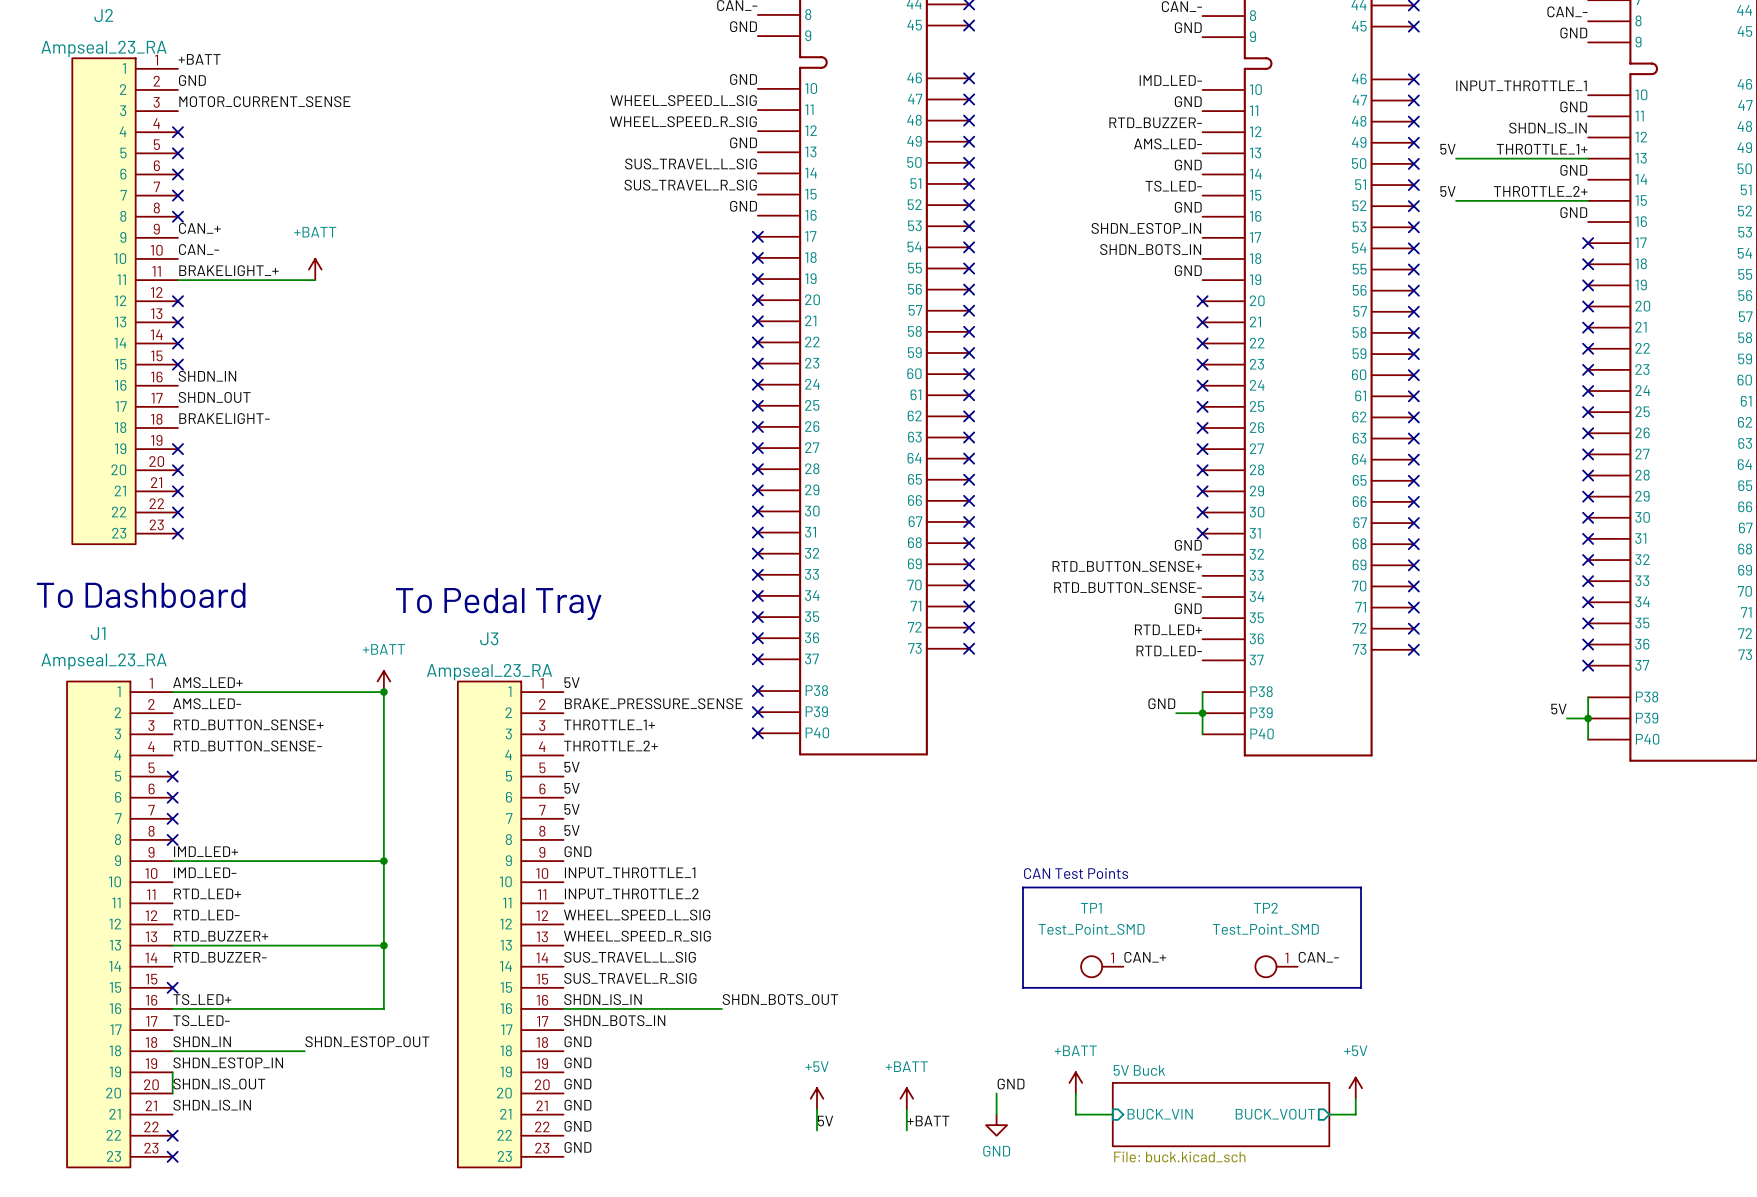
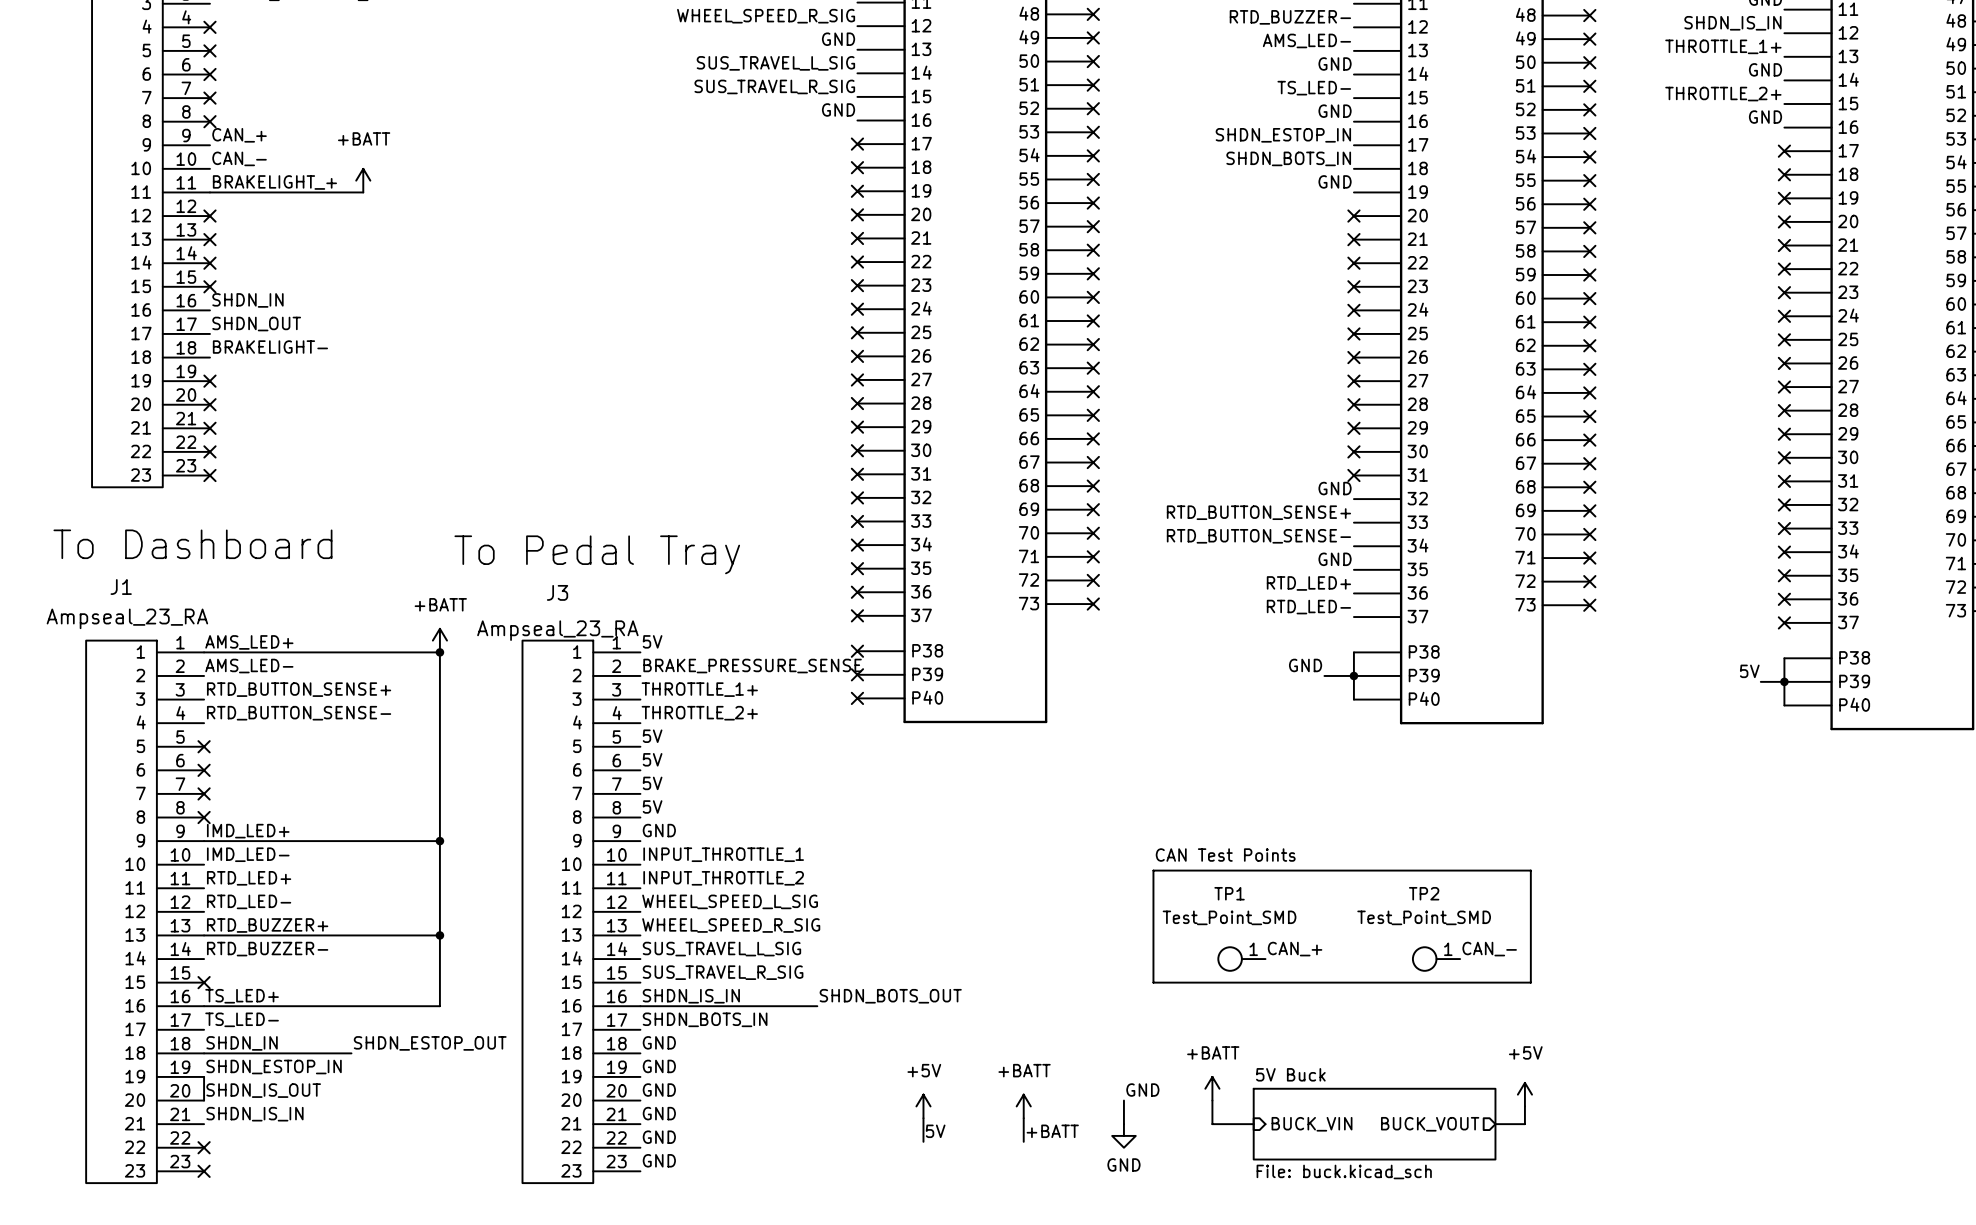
label: 5V (1448, 149) -> none
wire: (1456, 158) (1588, 158) -> none
label: 5V (1448, 191) -> none
wire: (1456, 200) (1588, 200) -> none

